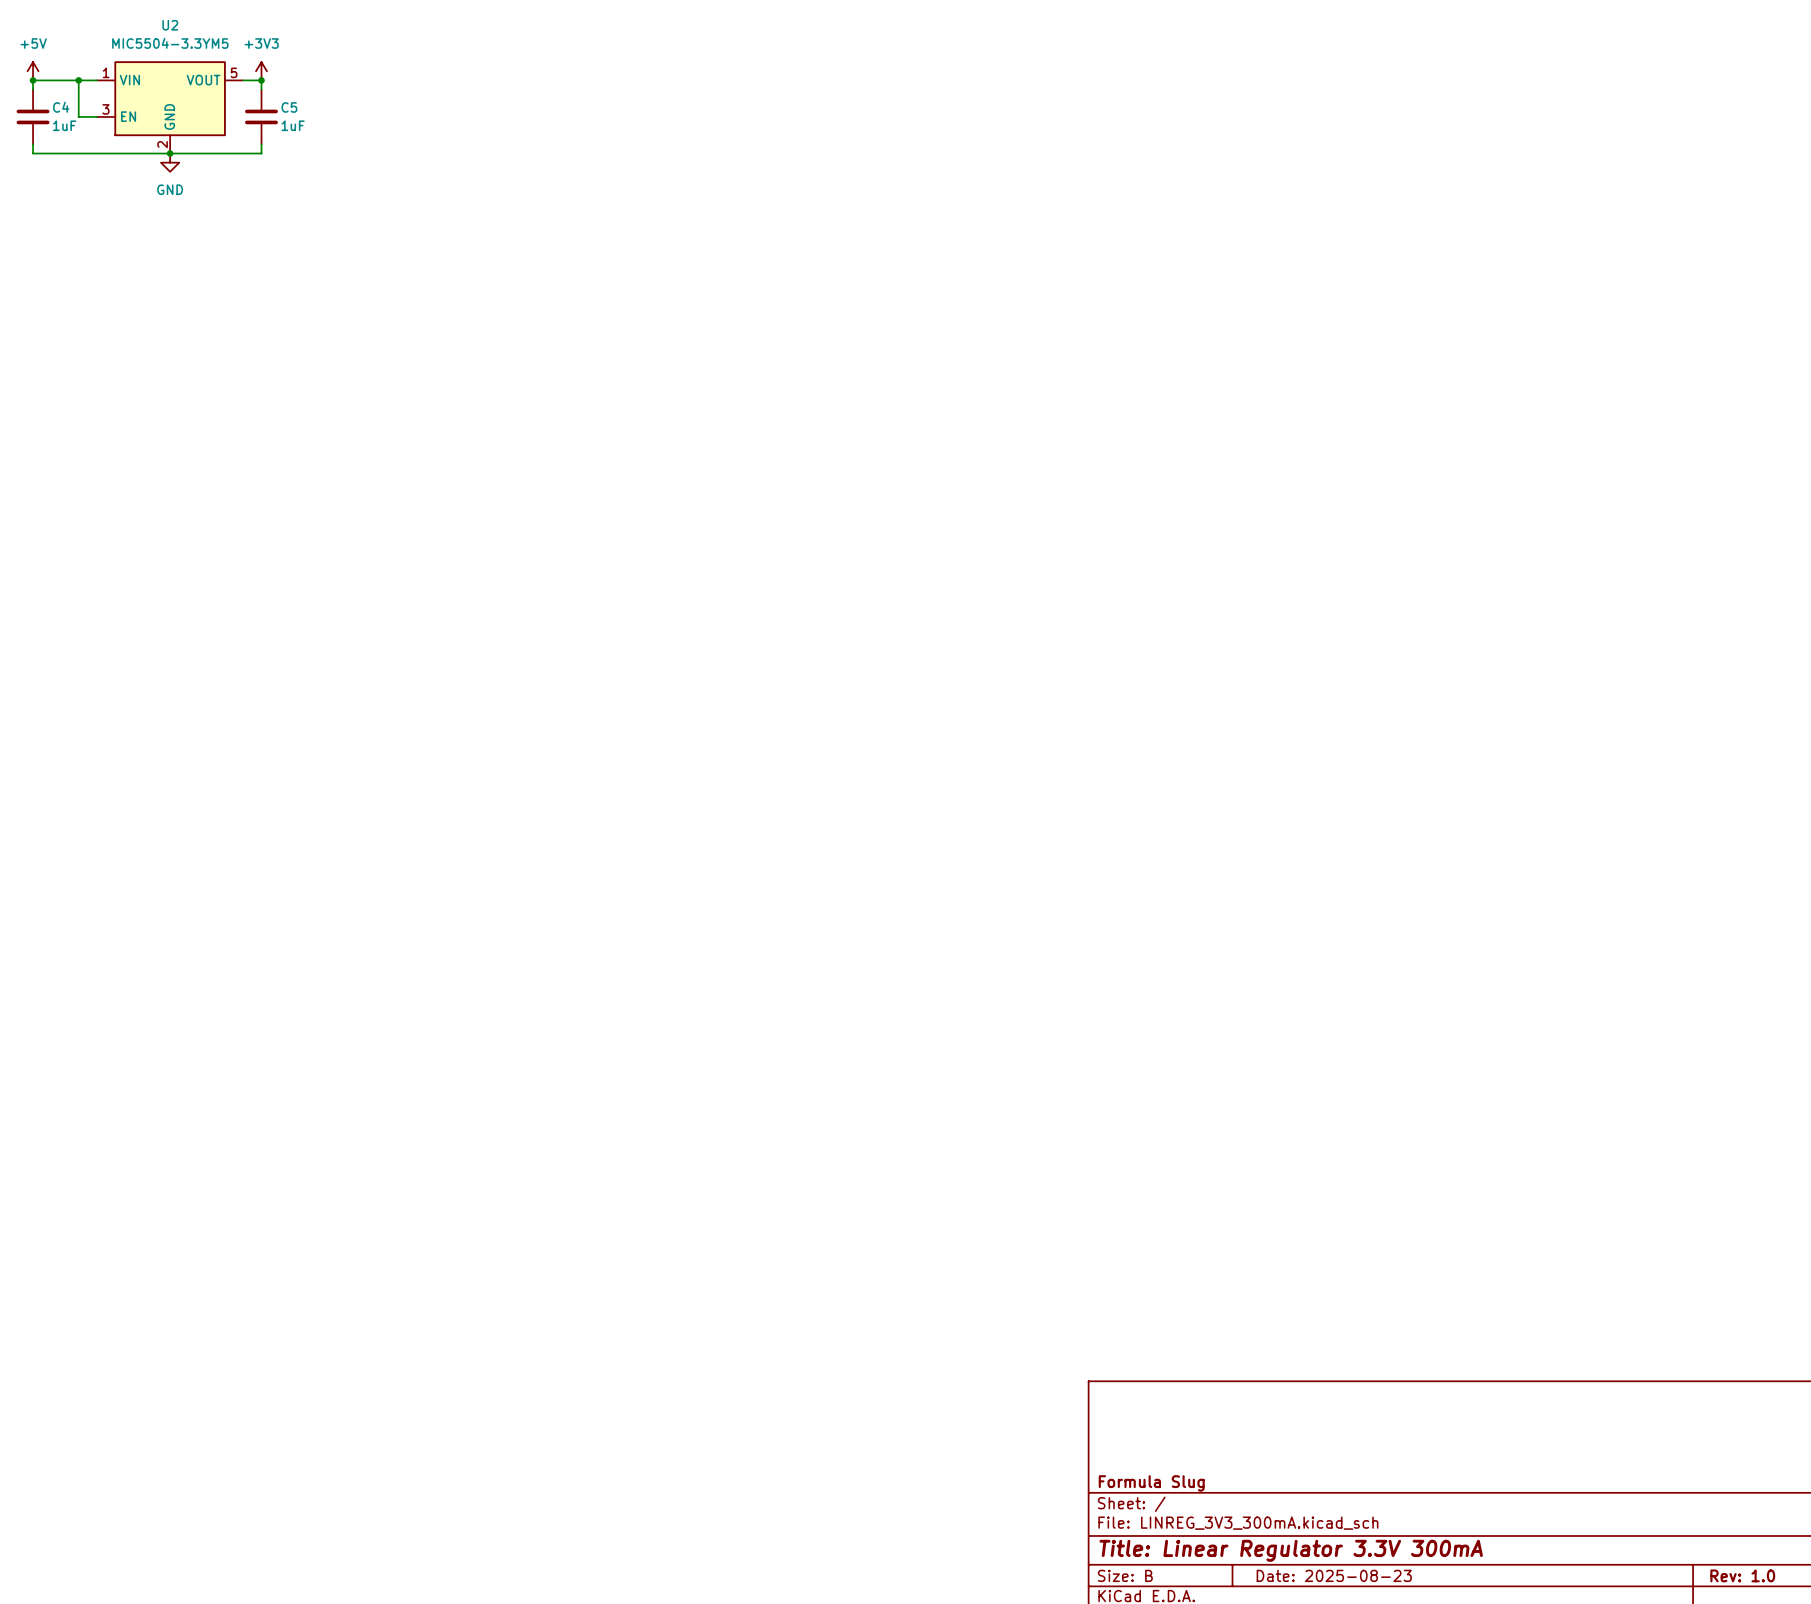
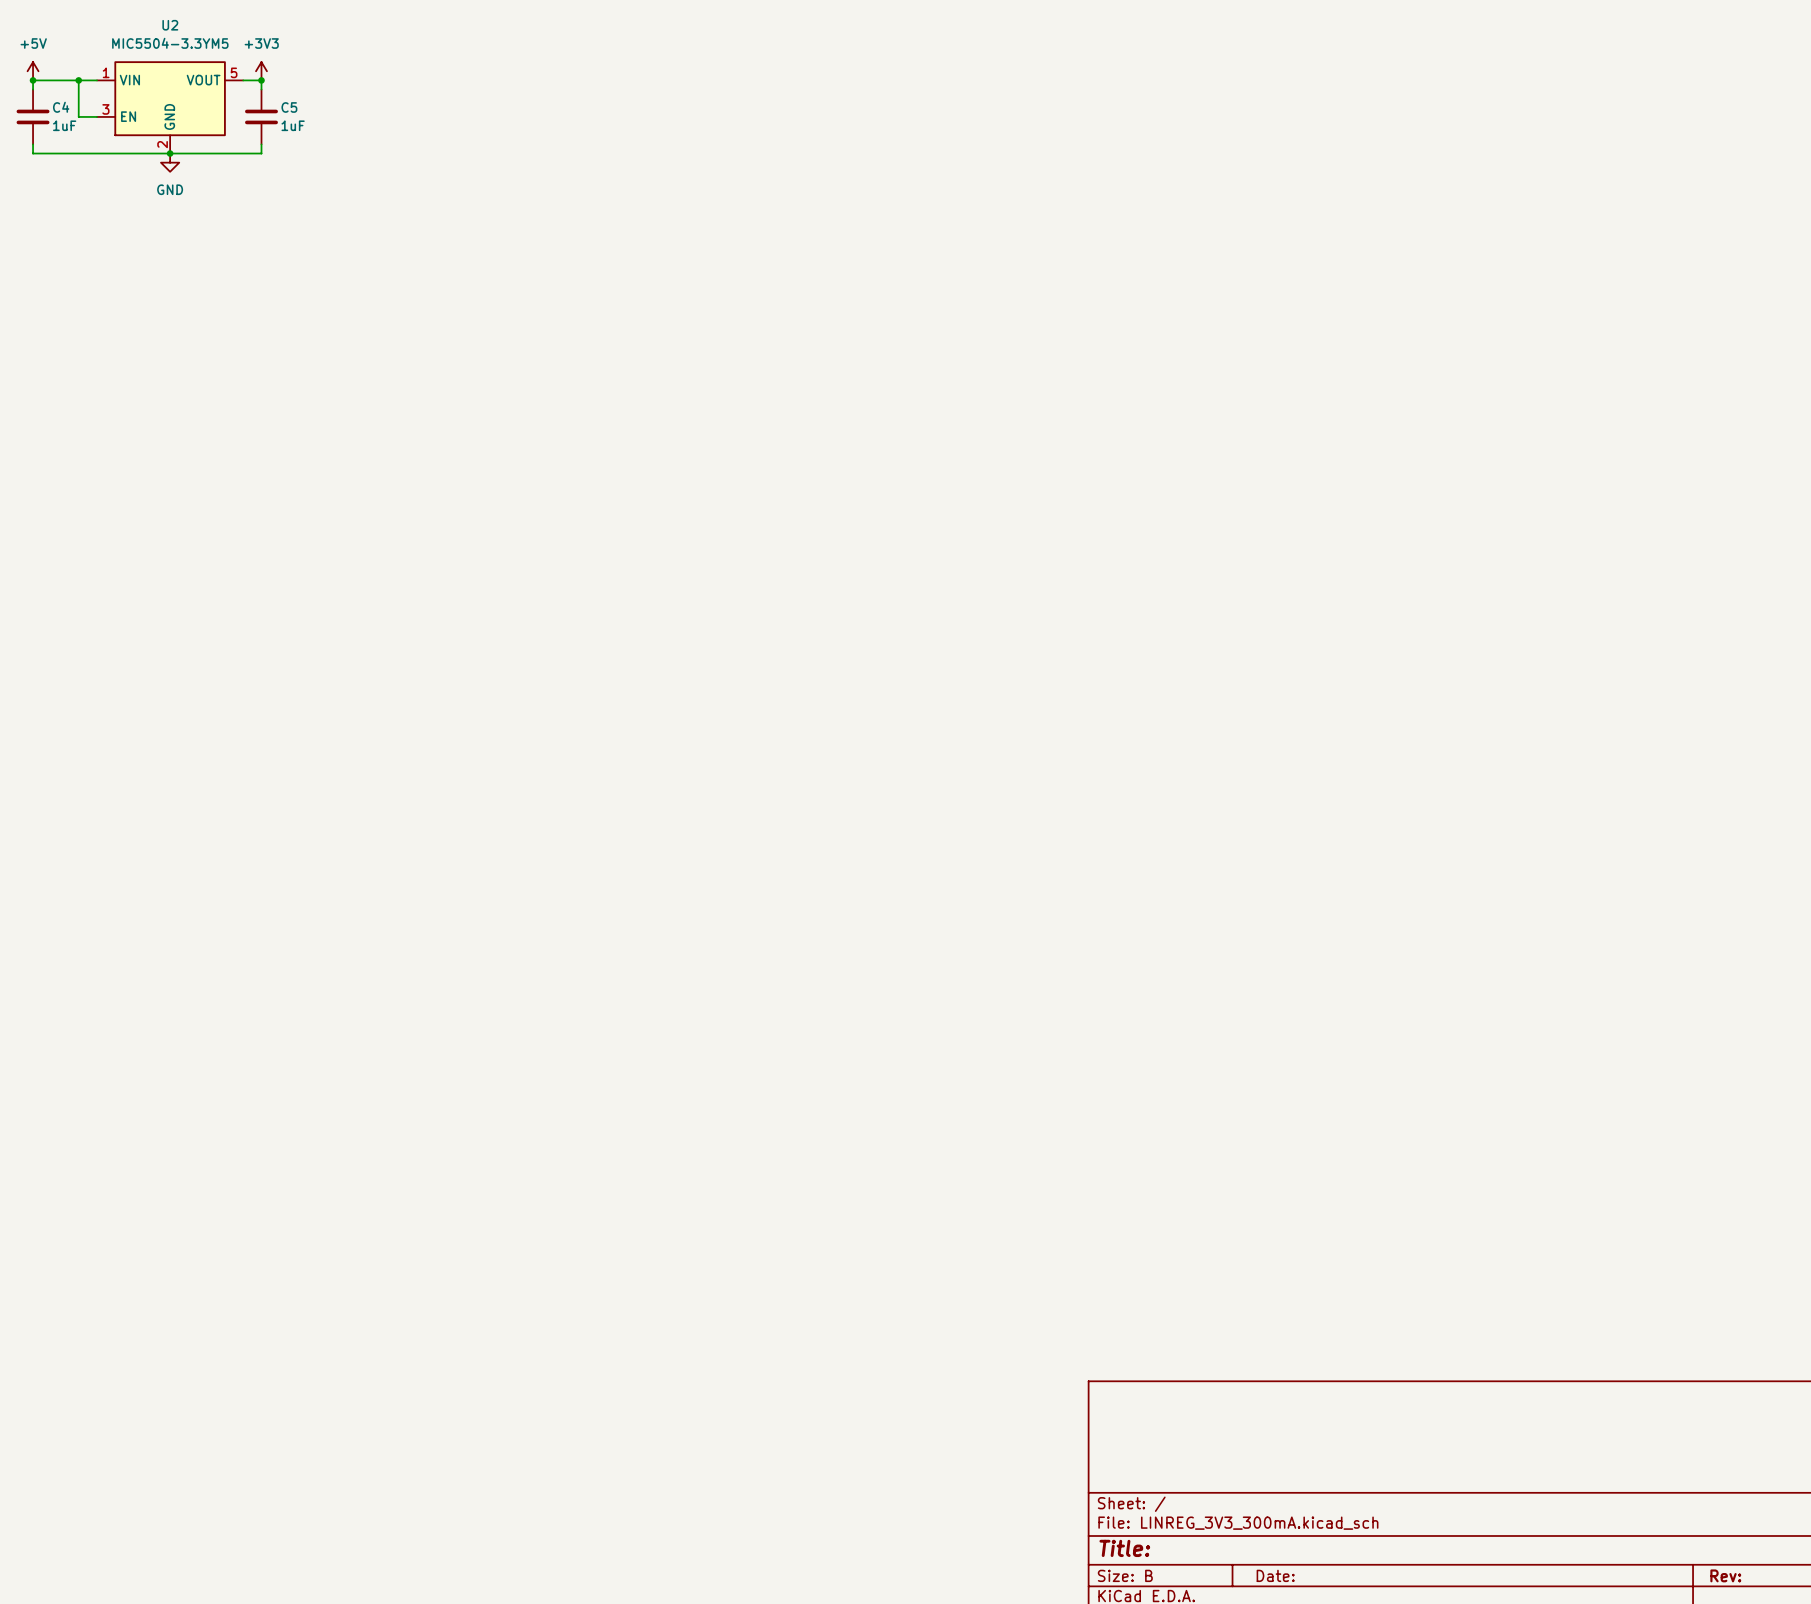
title block: Formula Slug (1151, 1483) -> none
title block: Title: Linear Regulator 3.3V 300mA (1291, 1550) -> Title: (1124, 1548)
title block: Date: 2025-08-23 (1334, 1575) -> Date: (1275, 1575)
title block: Rev: 1.0 (1742, 1575) -> Rev: (1725, 1575)

